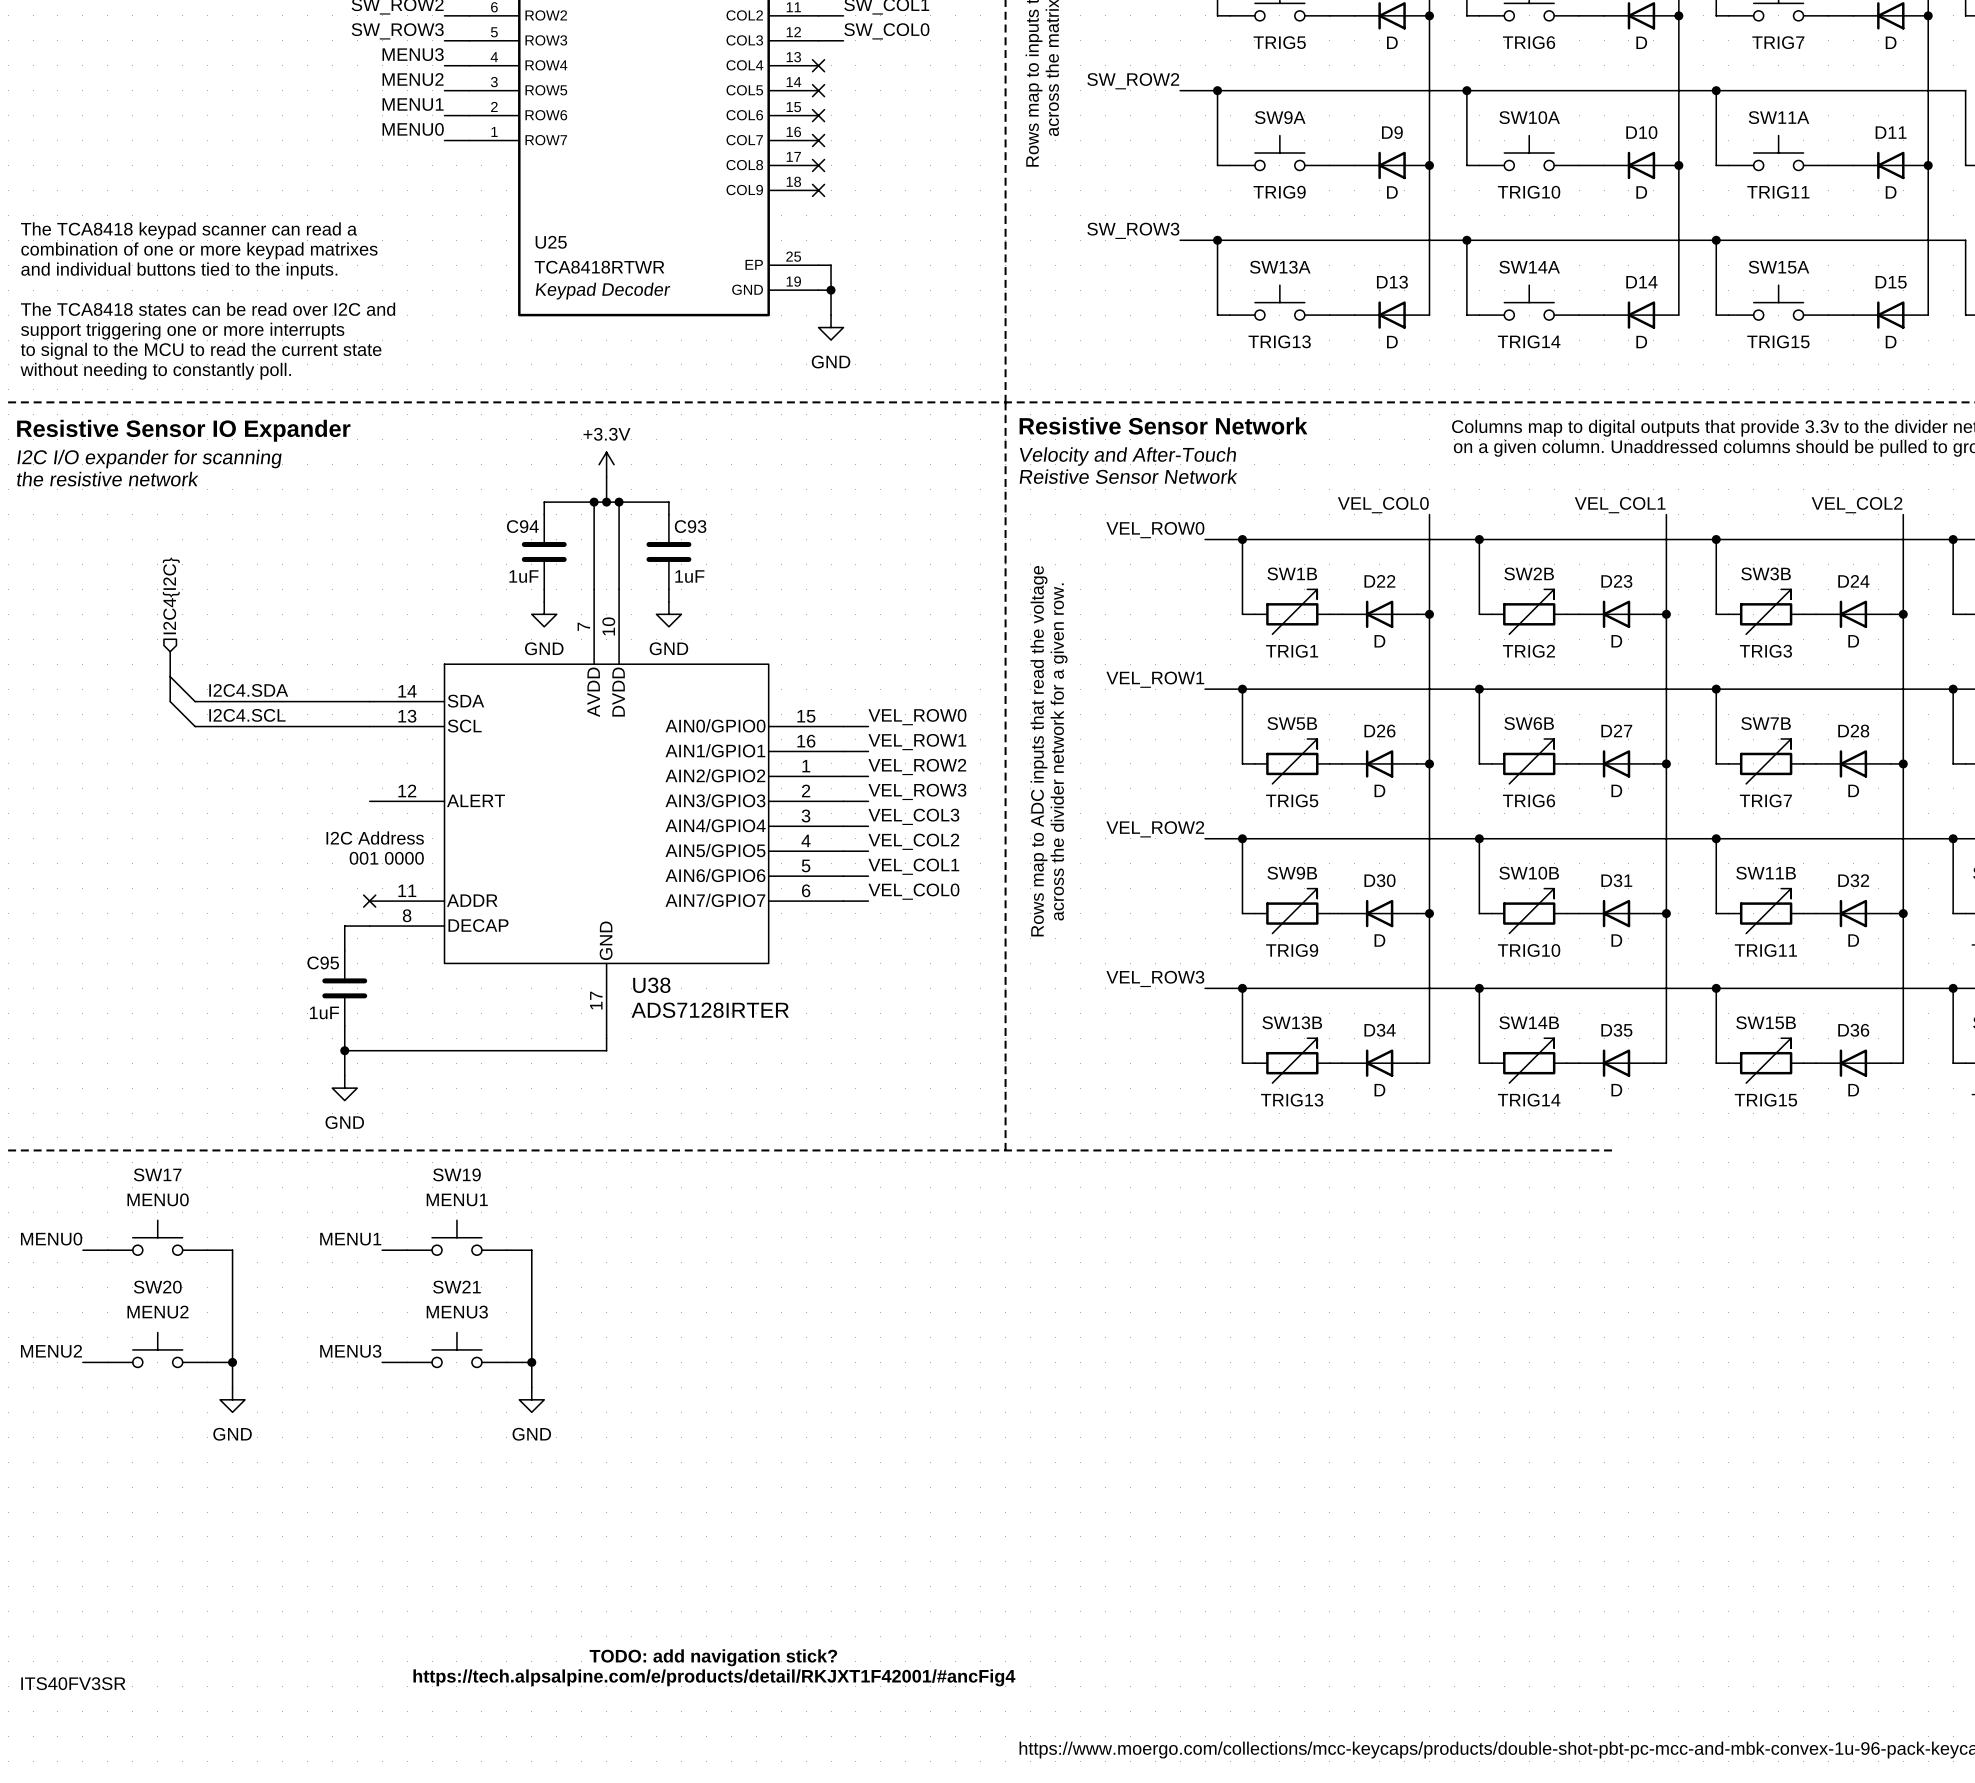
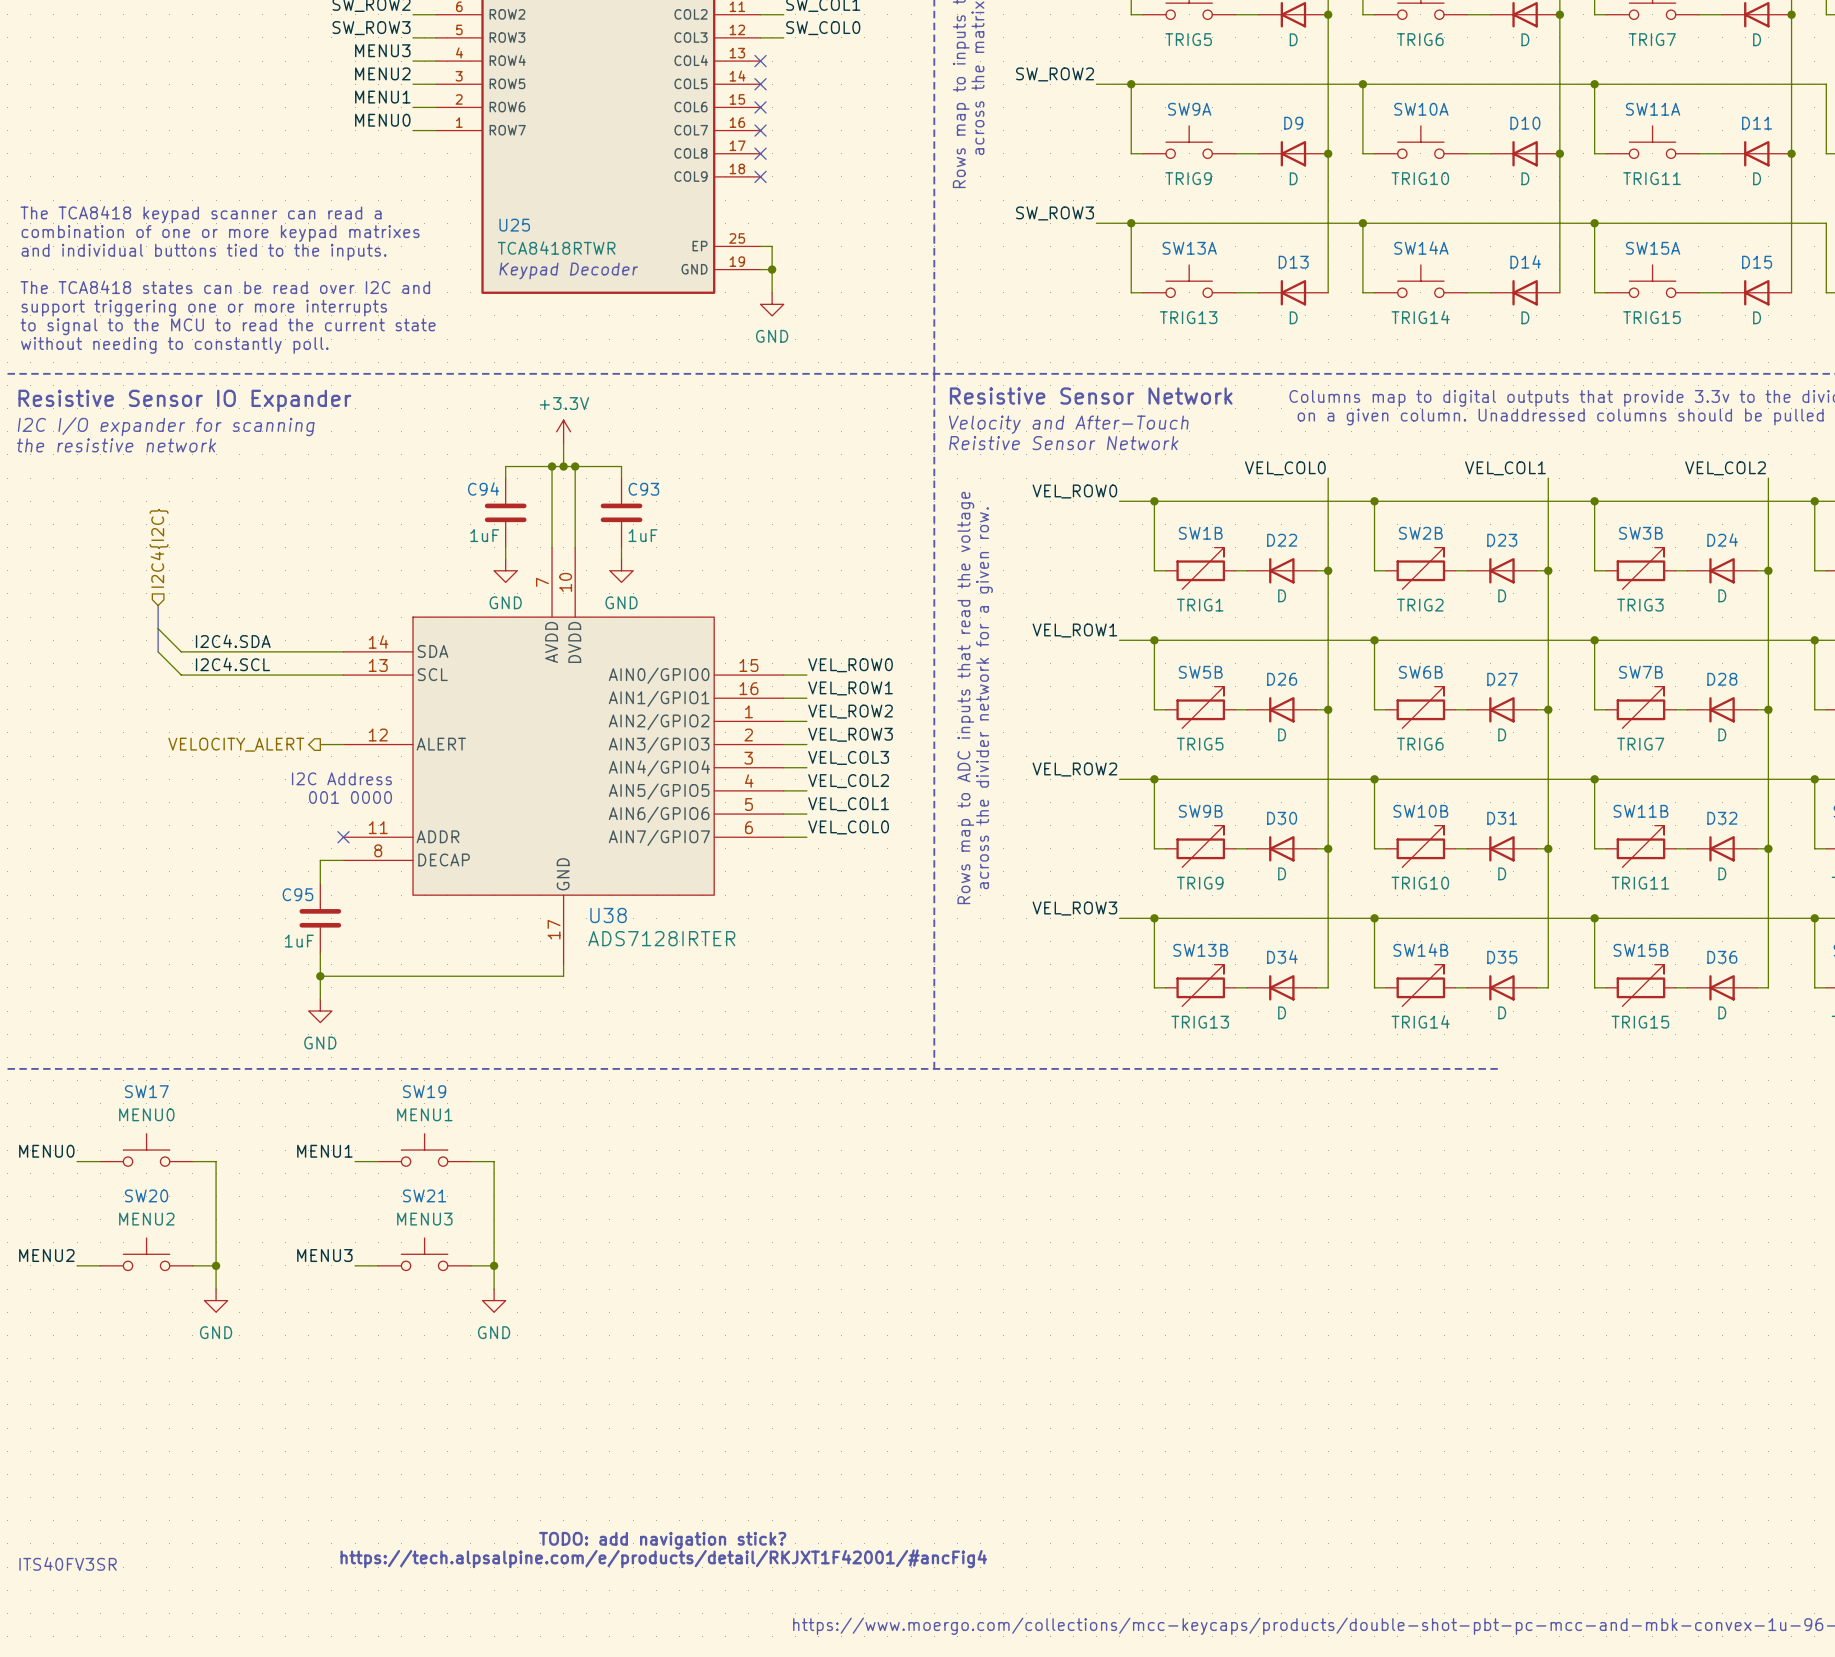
wire: none -> (320, 744) (343, 744)
hierarchical label: none -> VELOCITY_ALERT (236, 744)

